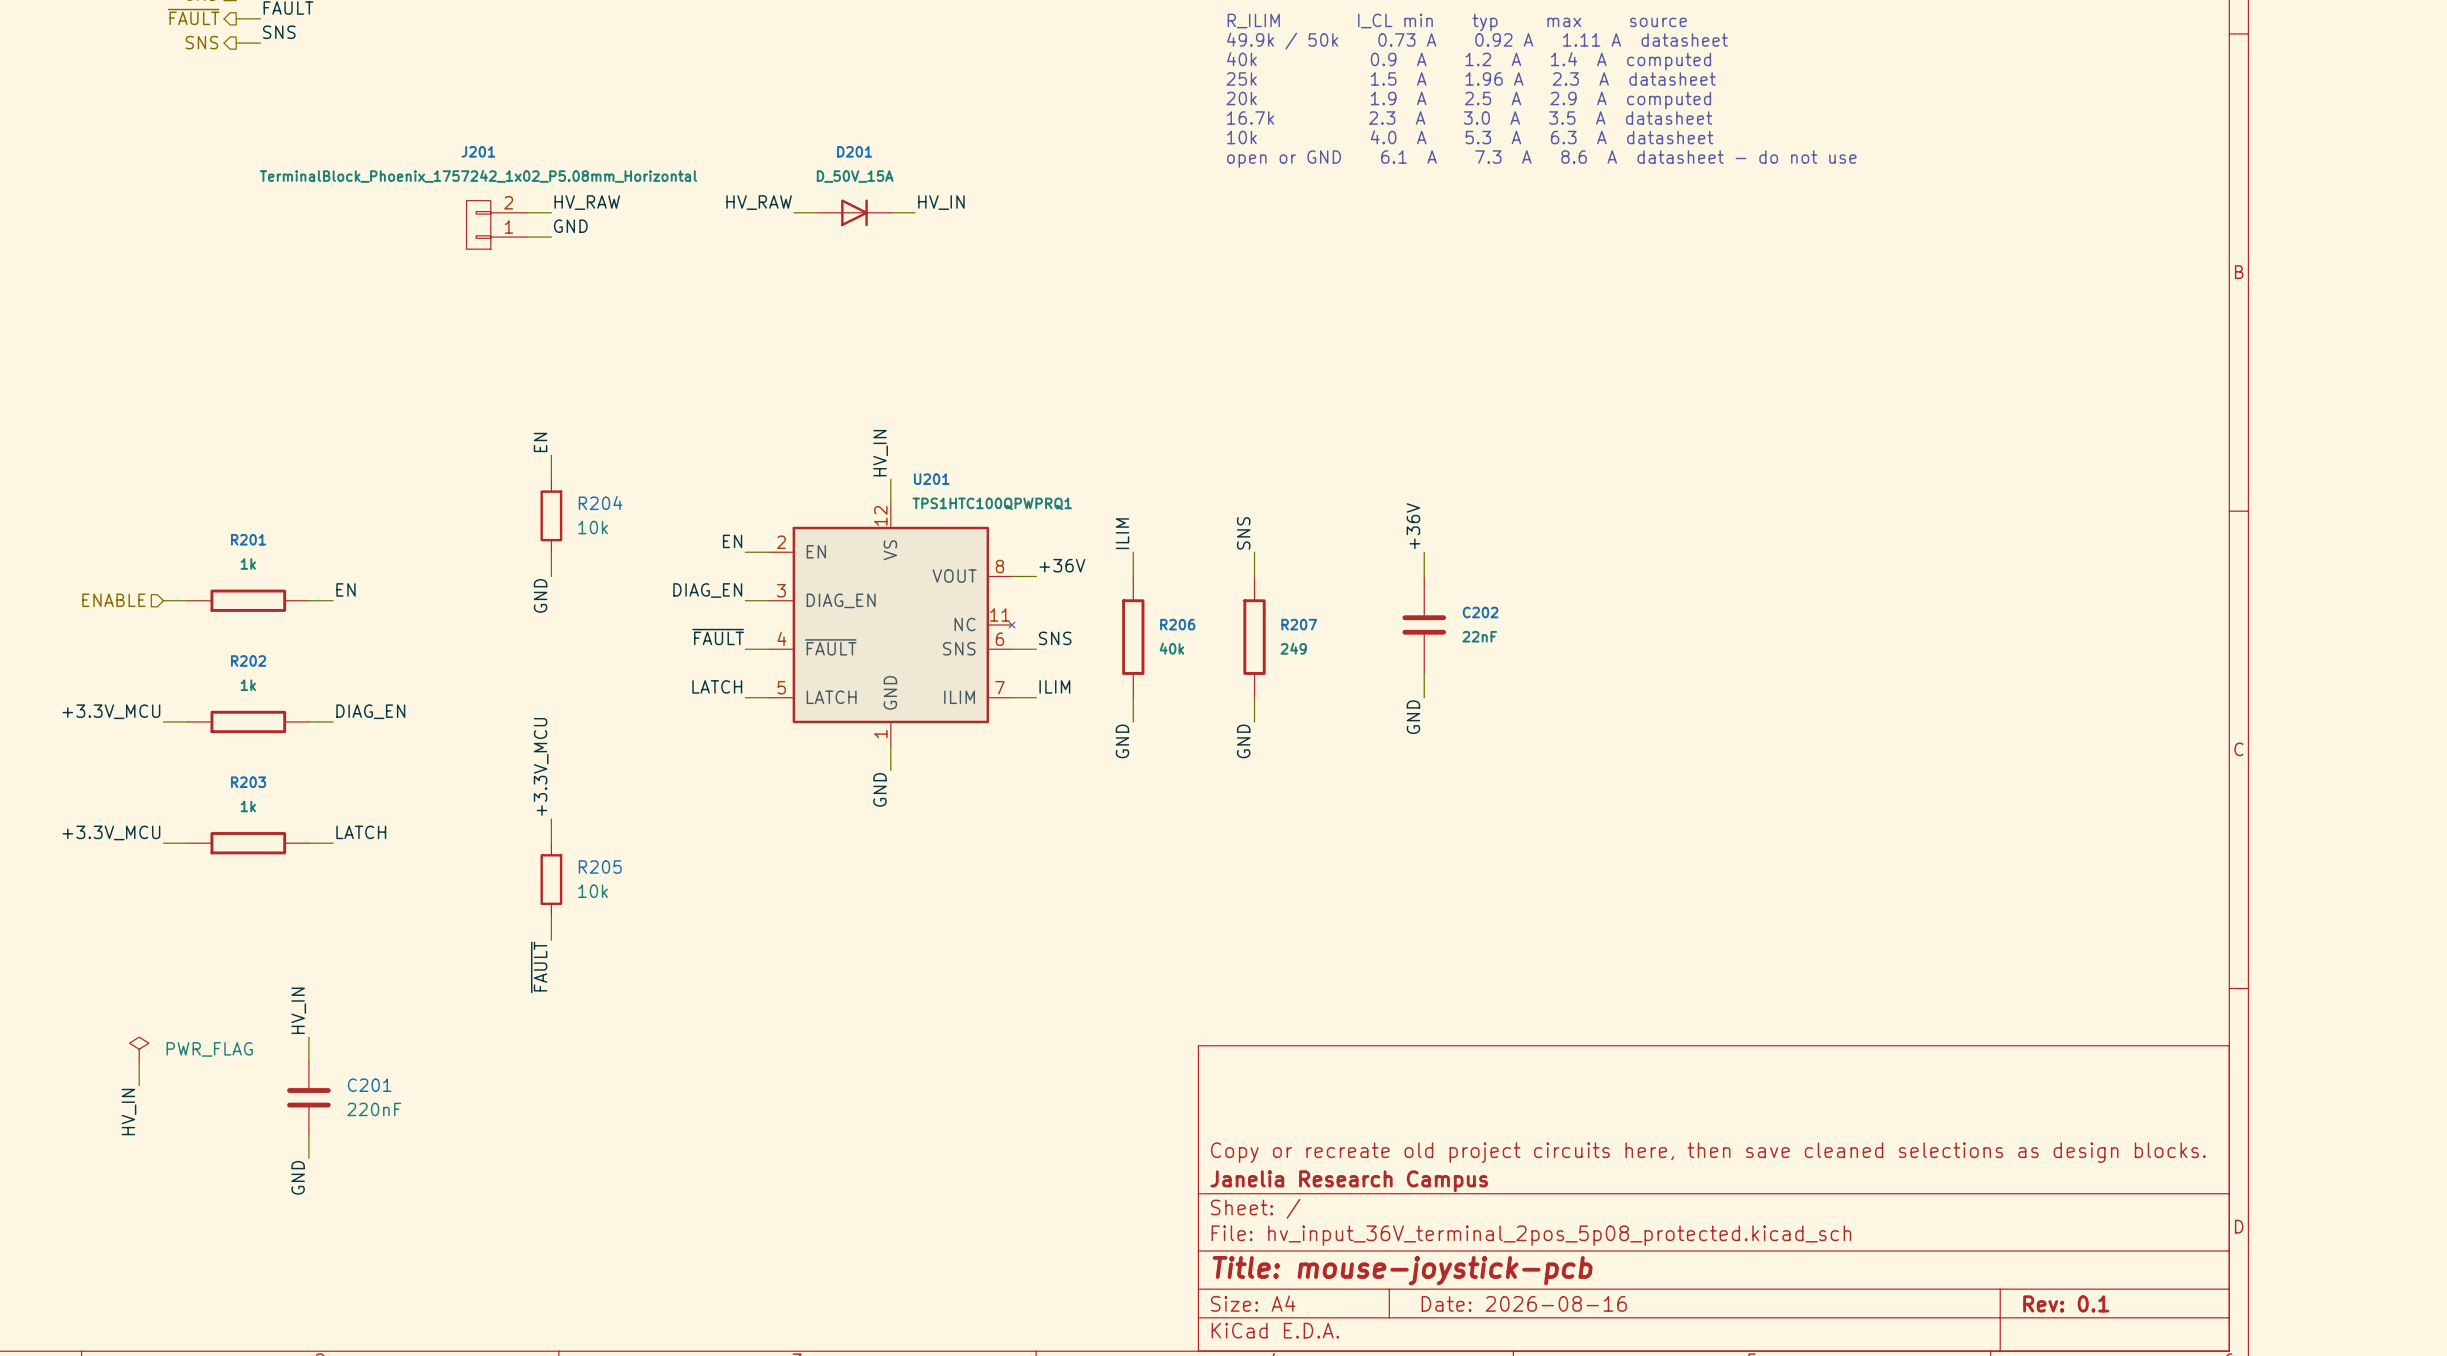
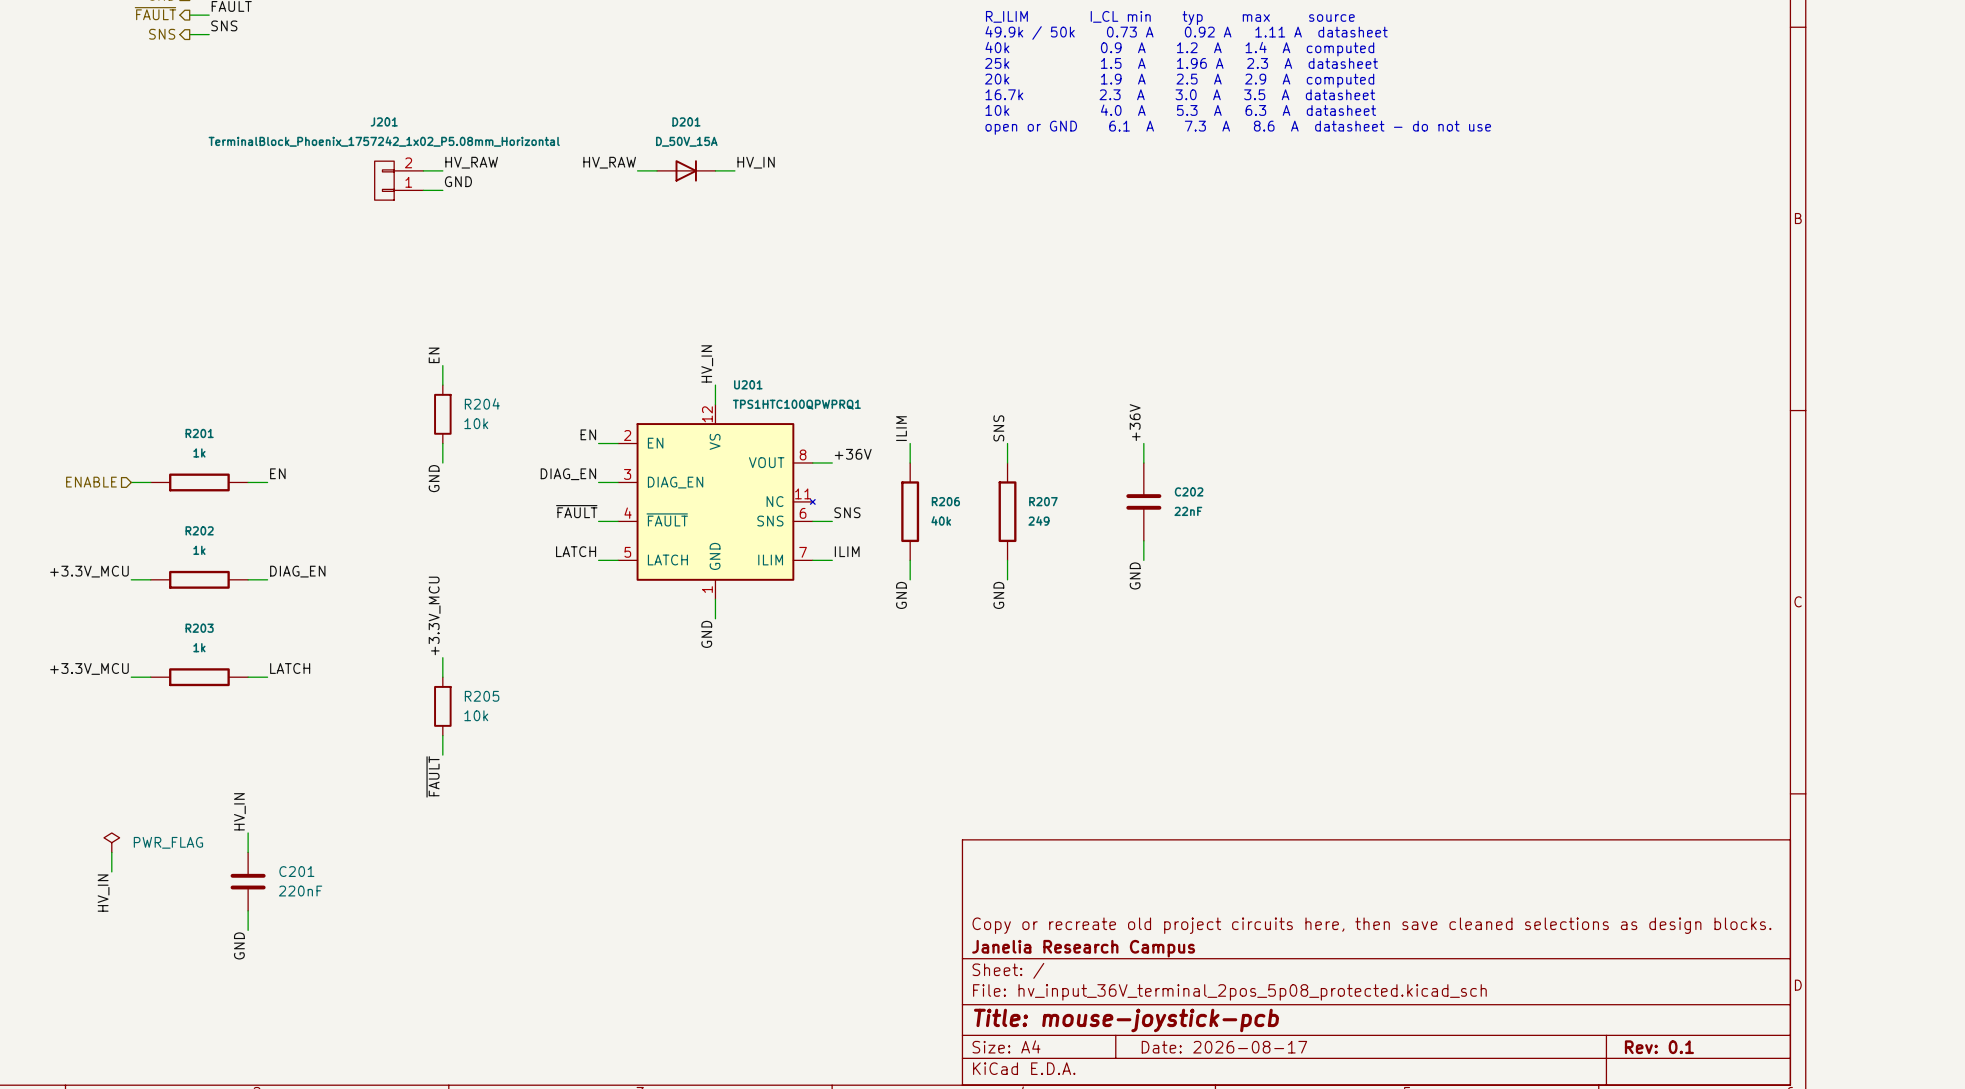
title block: Date: 2026-08-16 (1524, 1303) -> Date: 2026-08-17 (1224, 1047)

